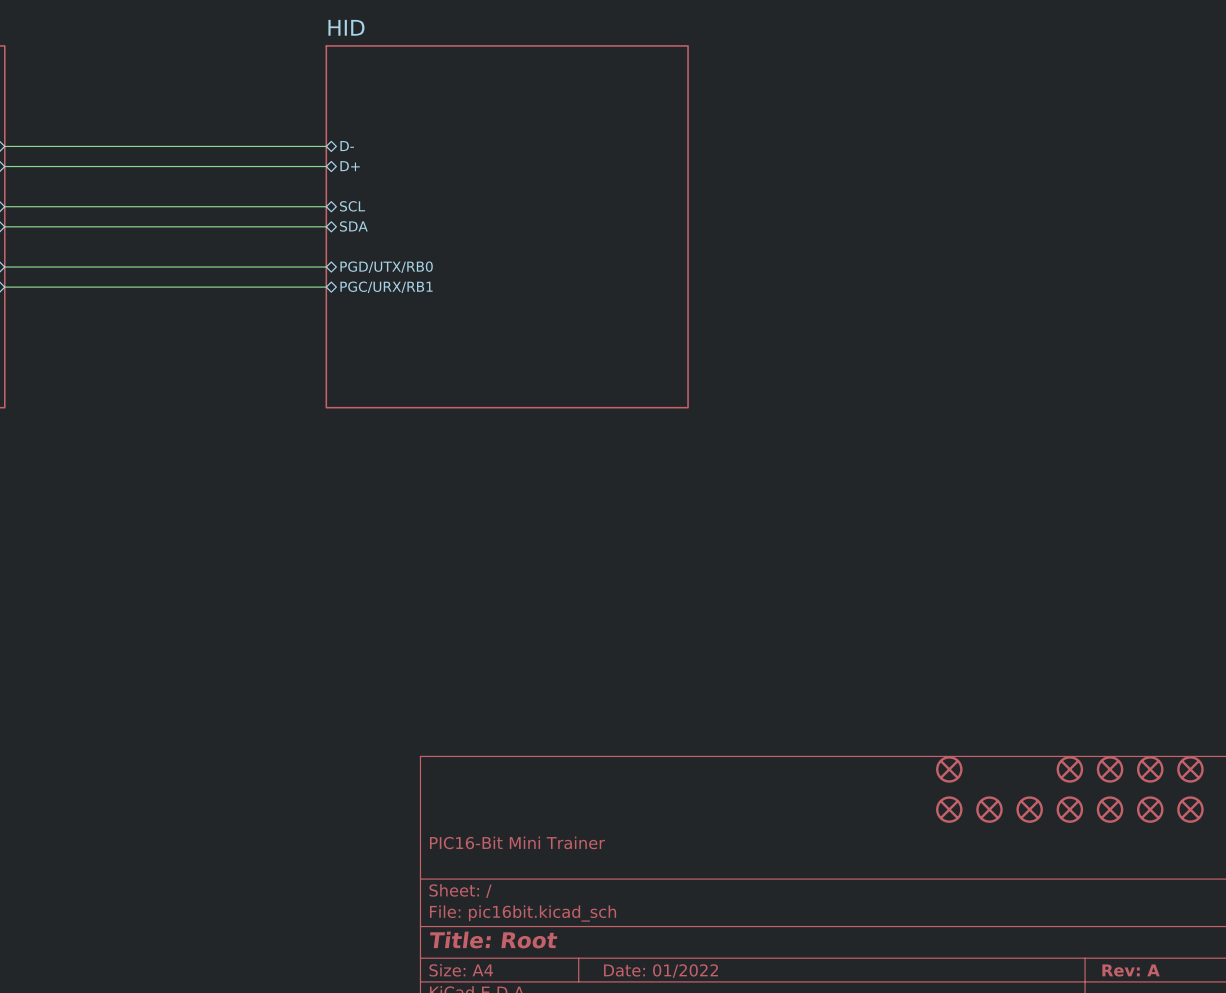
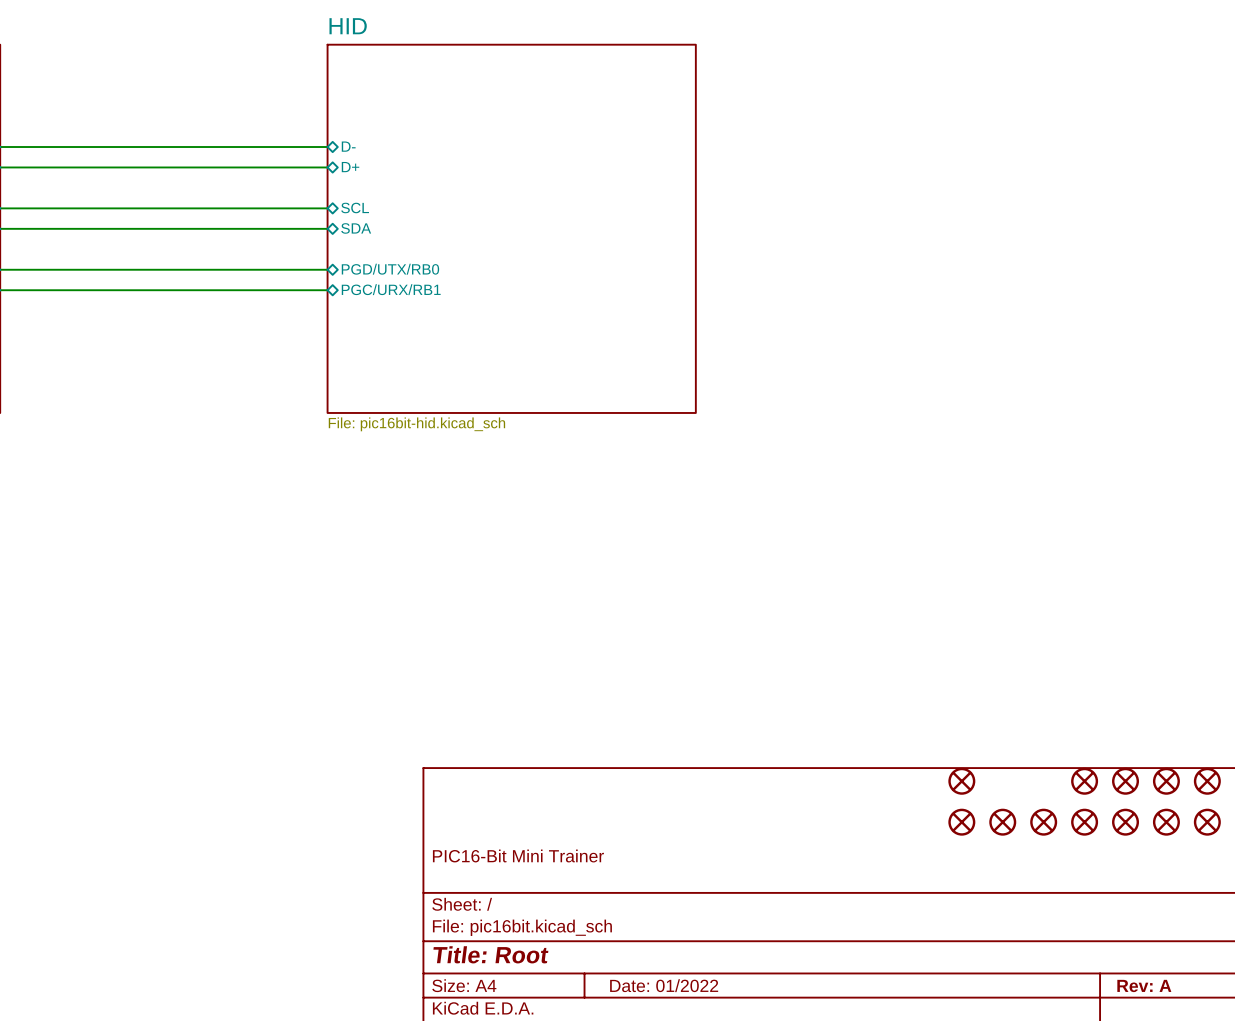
sheet HID value: none -> File: pic16bit-hid.kicad_sch (416, 424)

